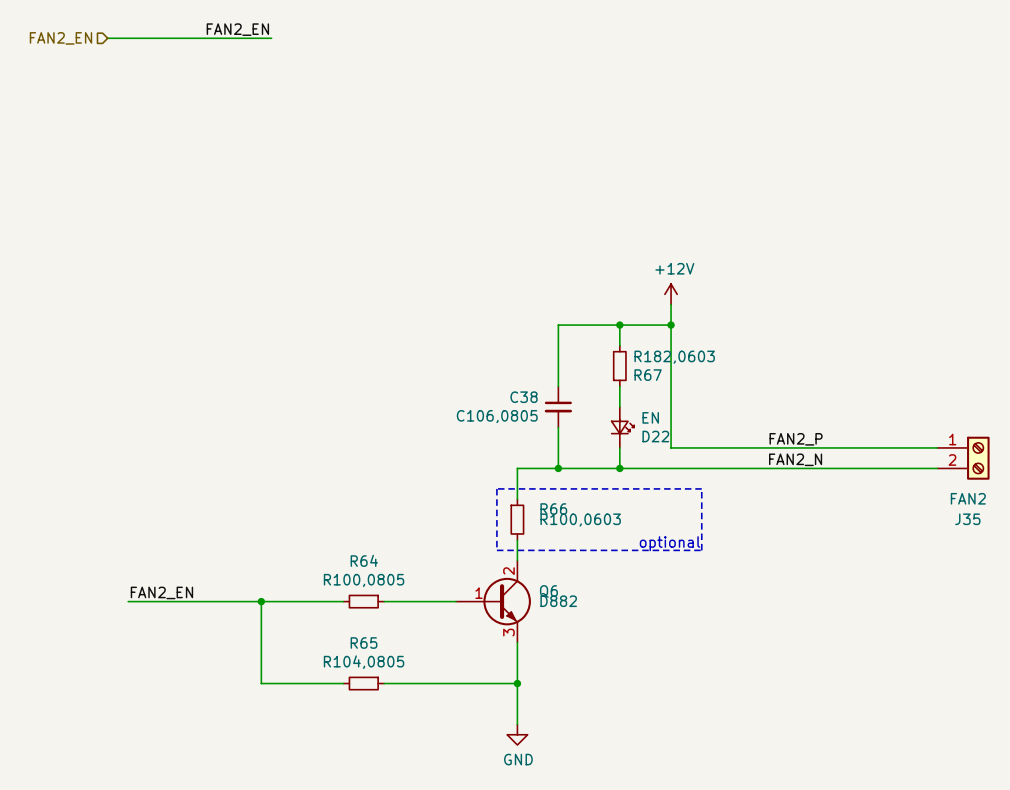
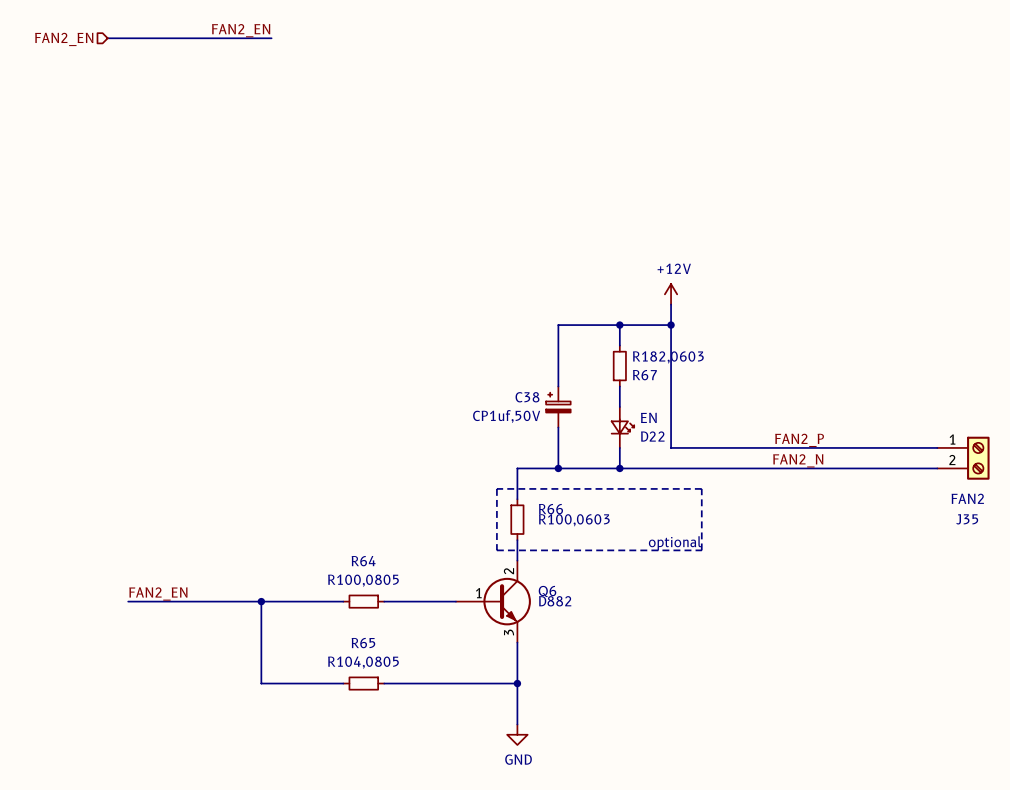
C38 symbol: [544, 386, 573, 428] -> [546, 386, 571, 428]
C38 value: C106,0805 (497, 416) -> CP1uf,50V (506, 416)

